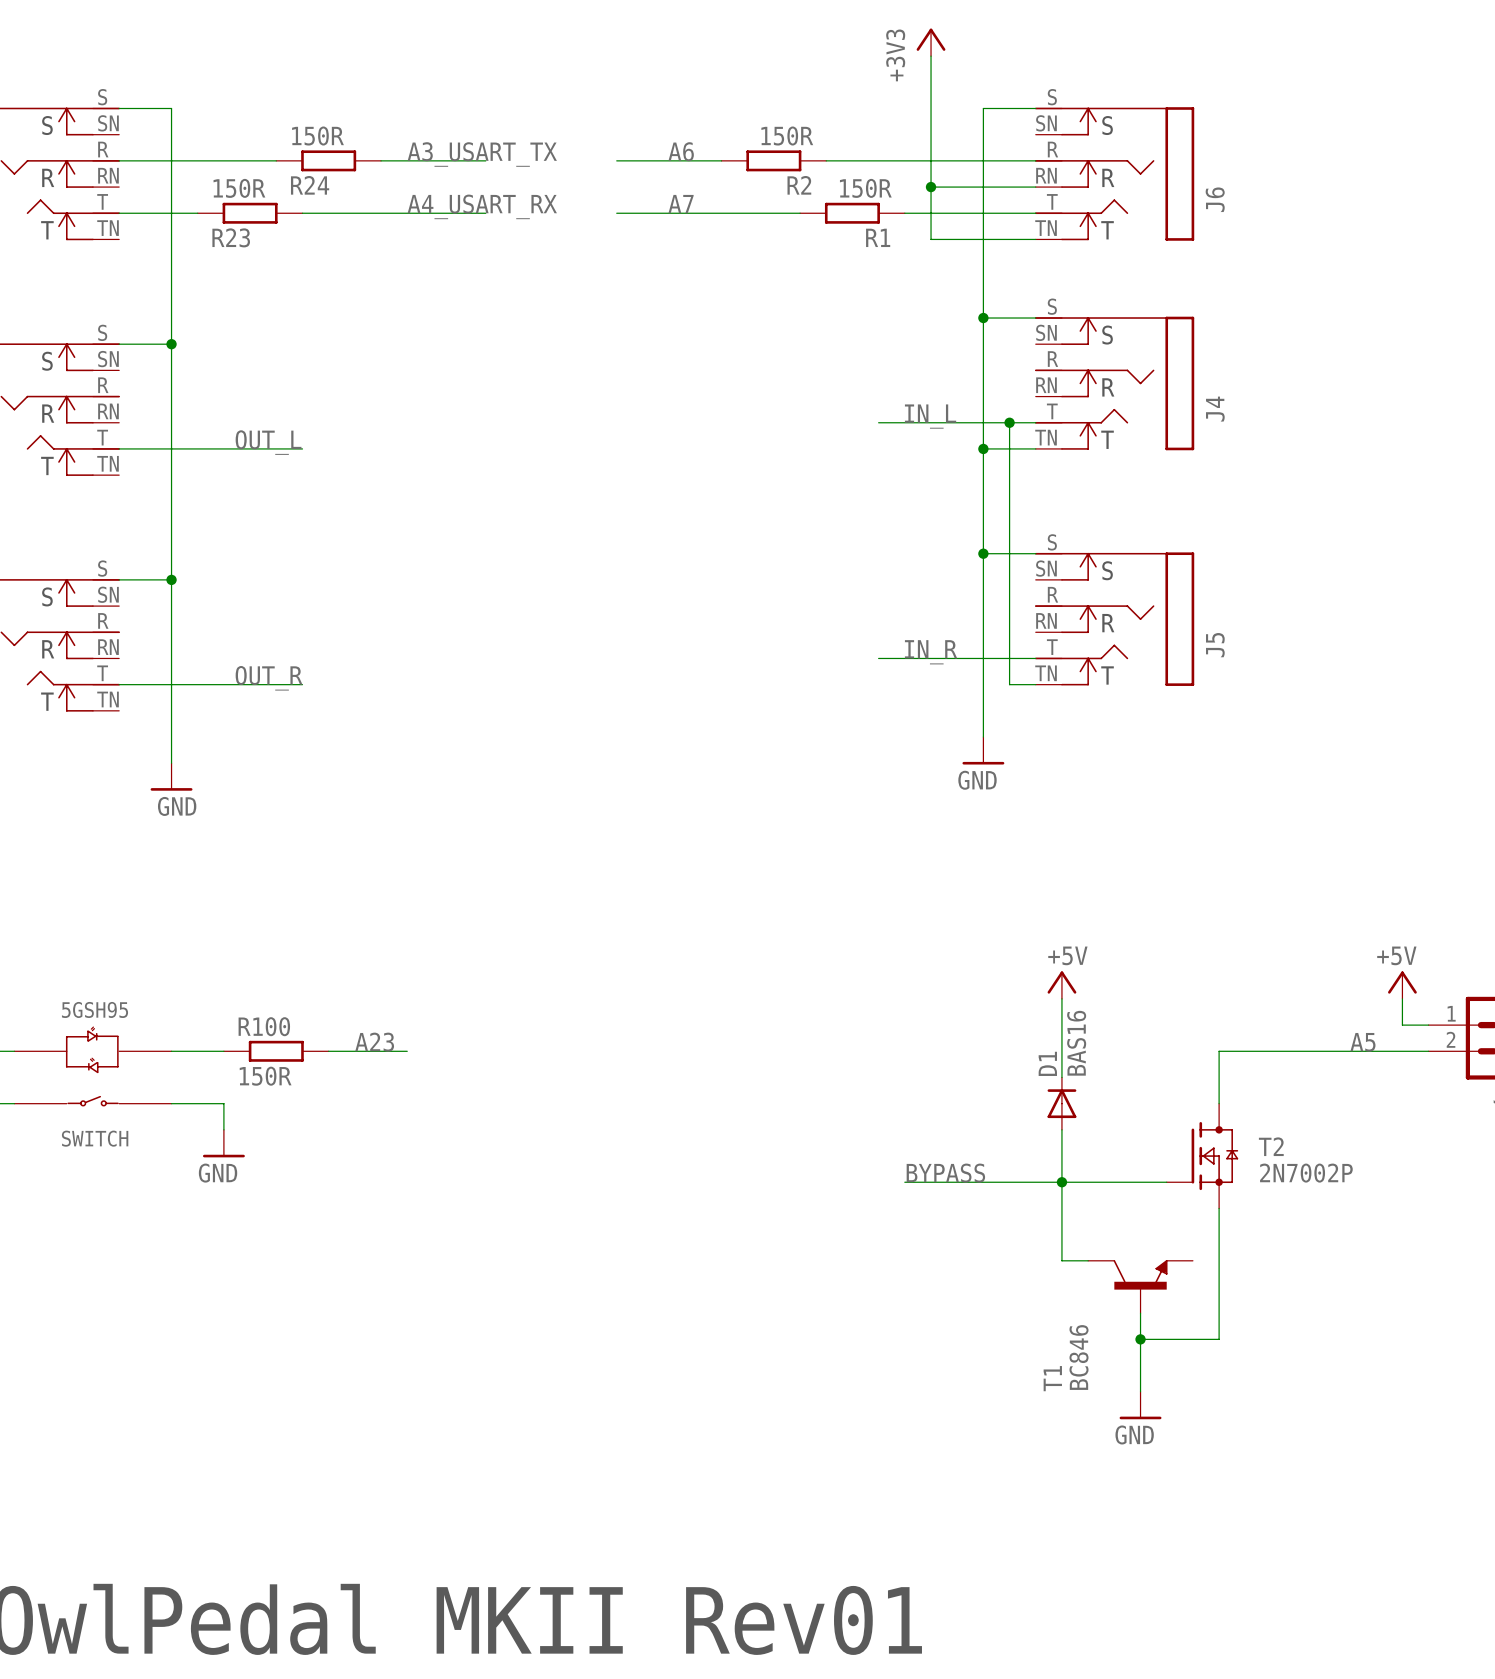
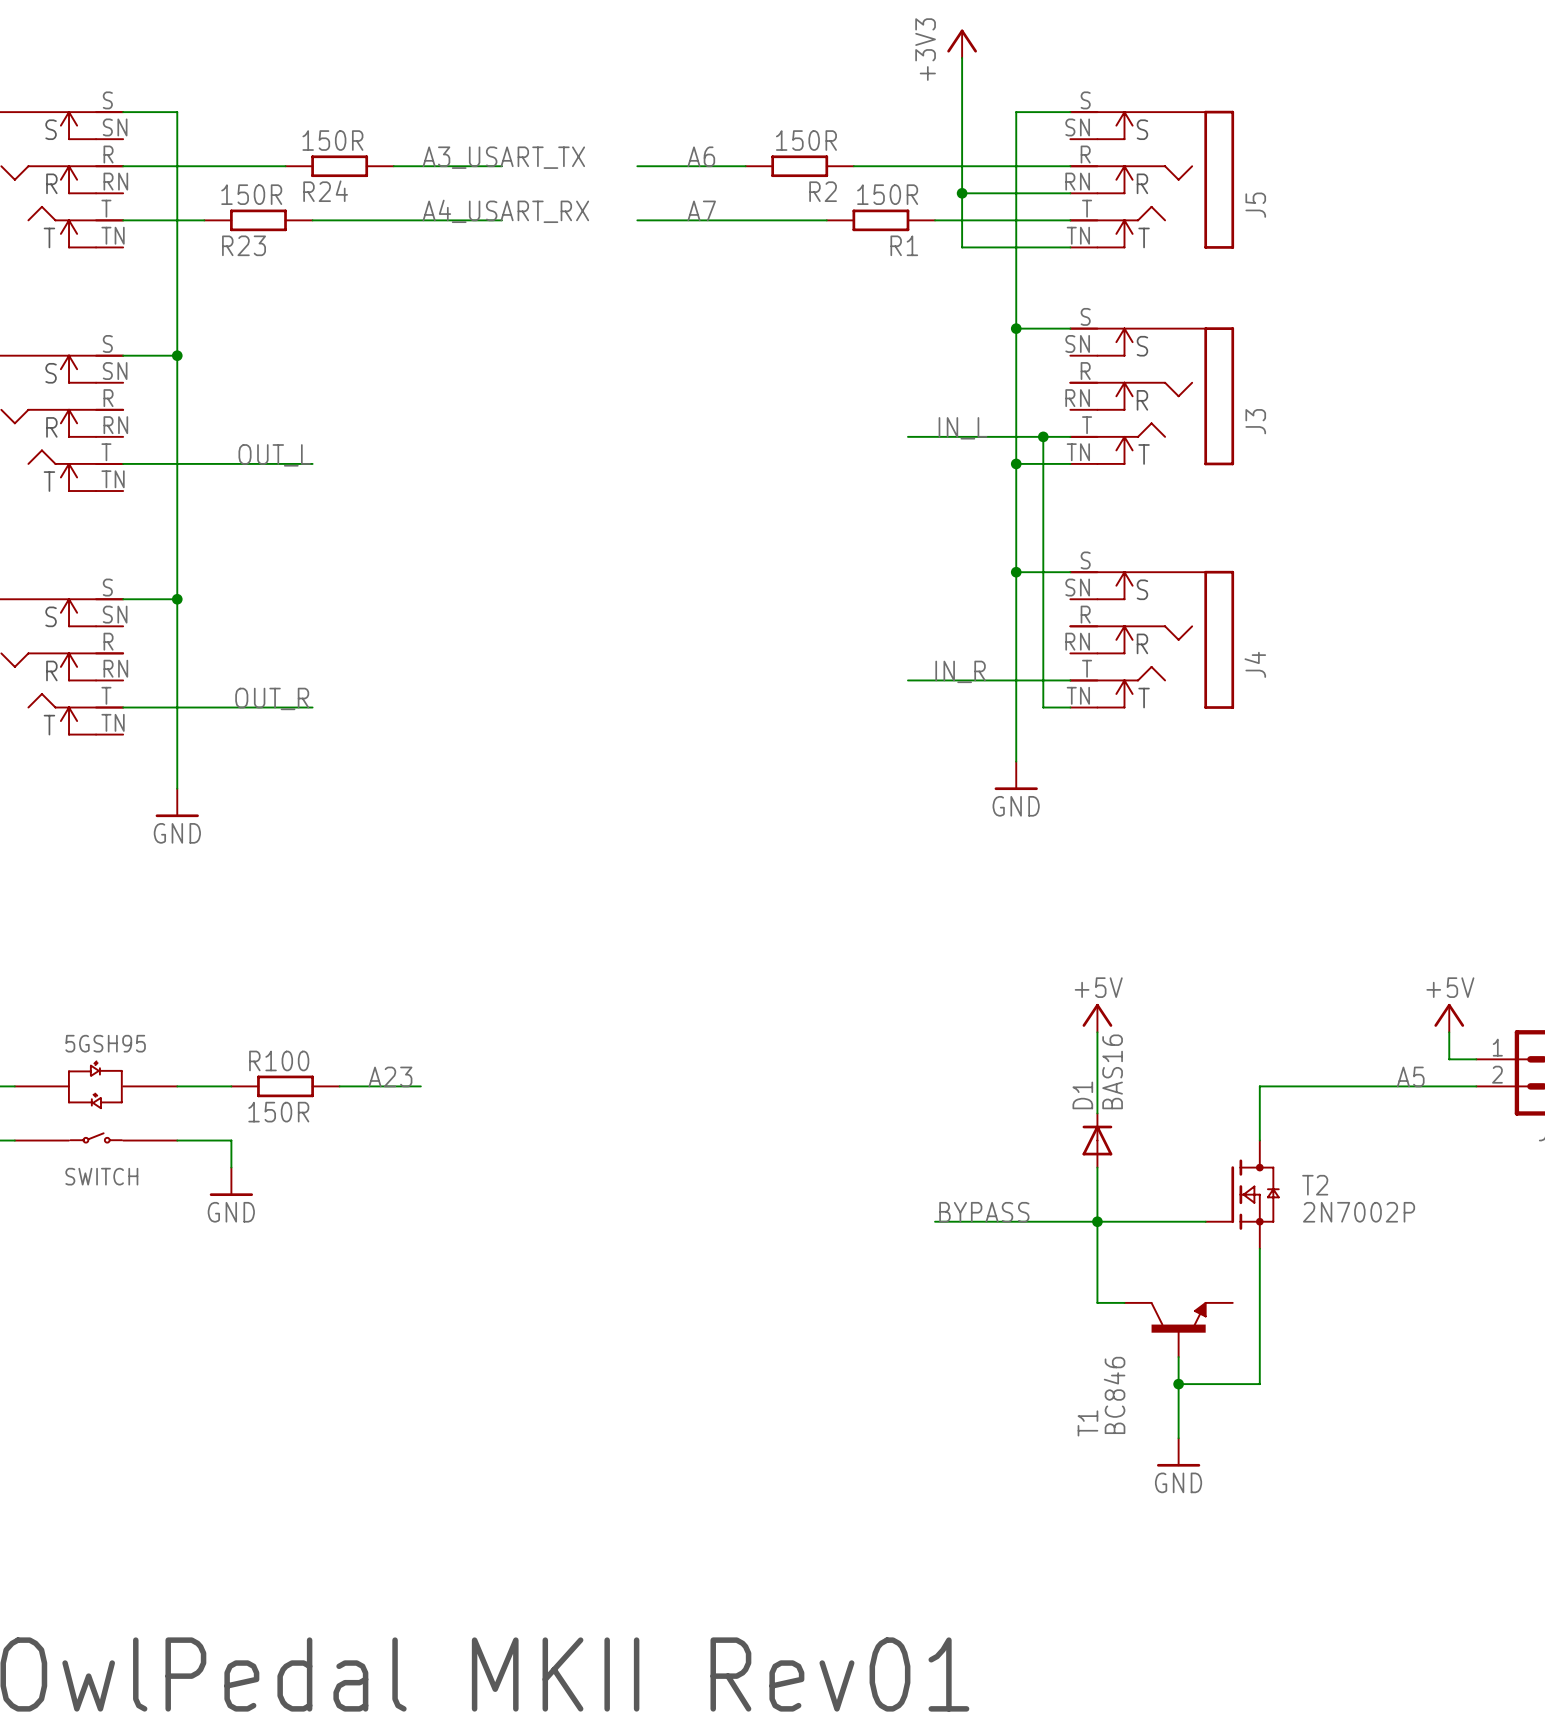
J6 name: J6 (1215, 199) -> J5 (1255, 205)
J4 name: J4 (1215, 409) -> J3 (1255, 421)
J5 name: J5 (1215, 645) -> J4 (1255, 664)

